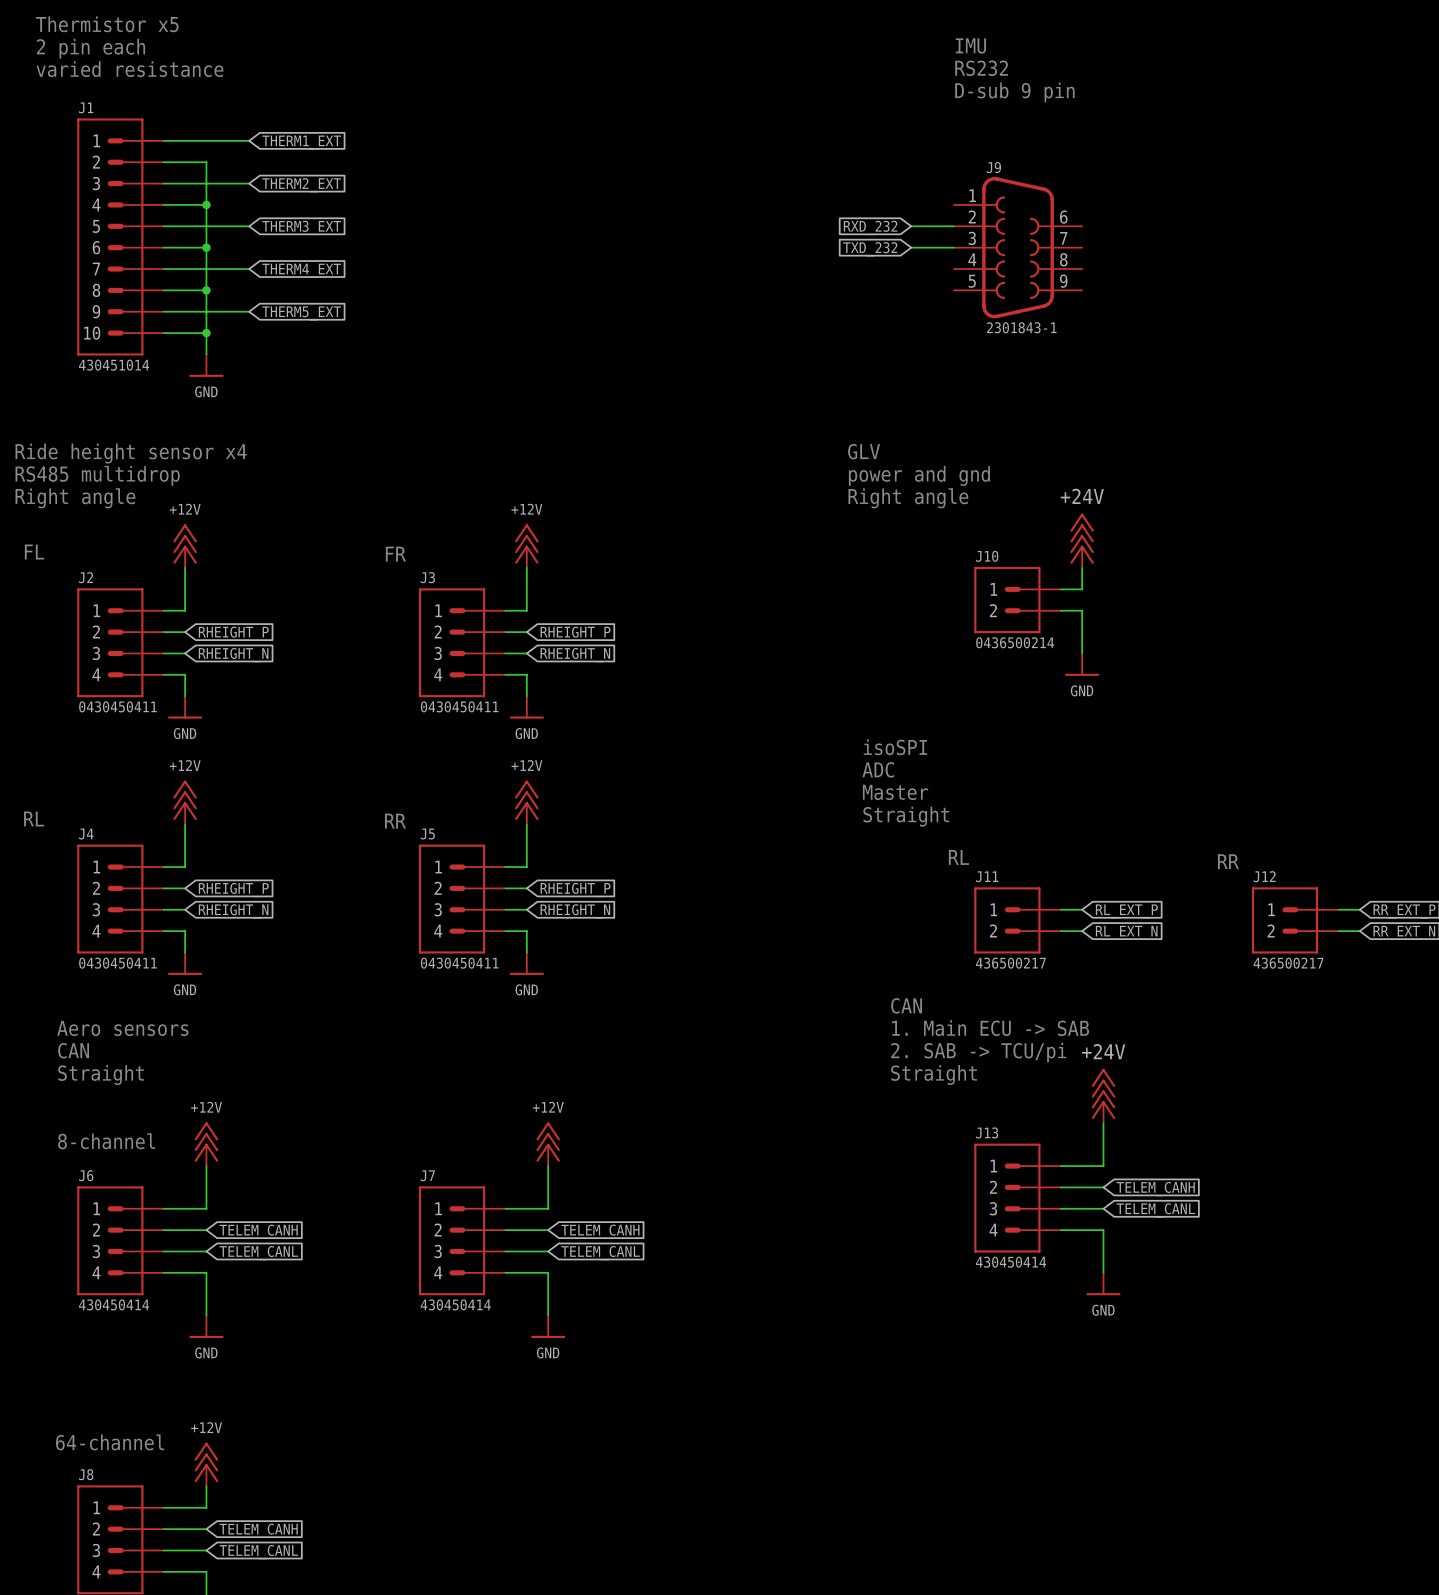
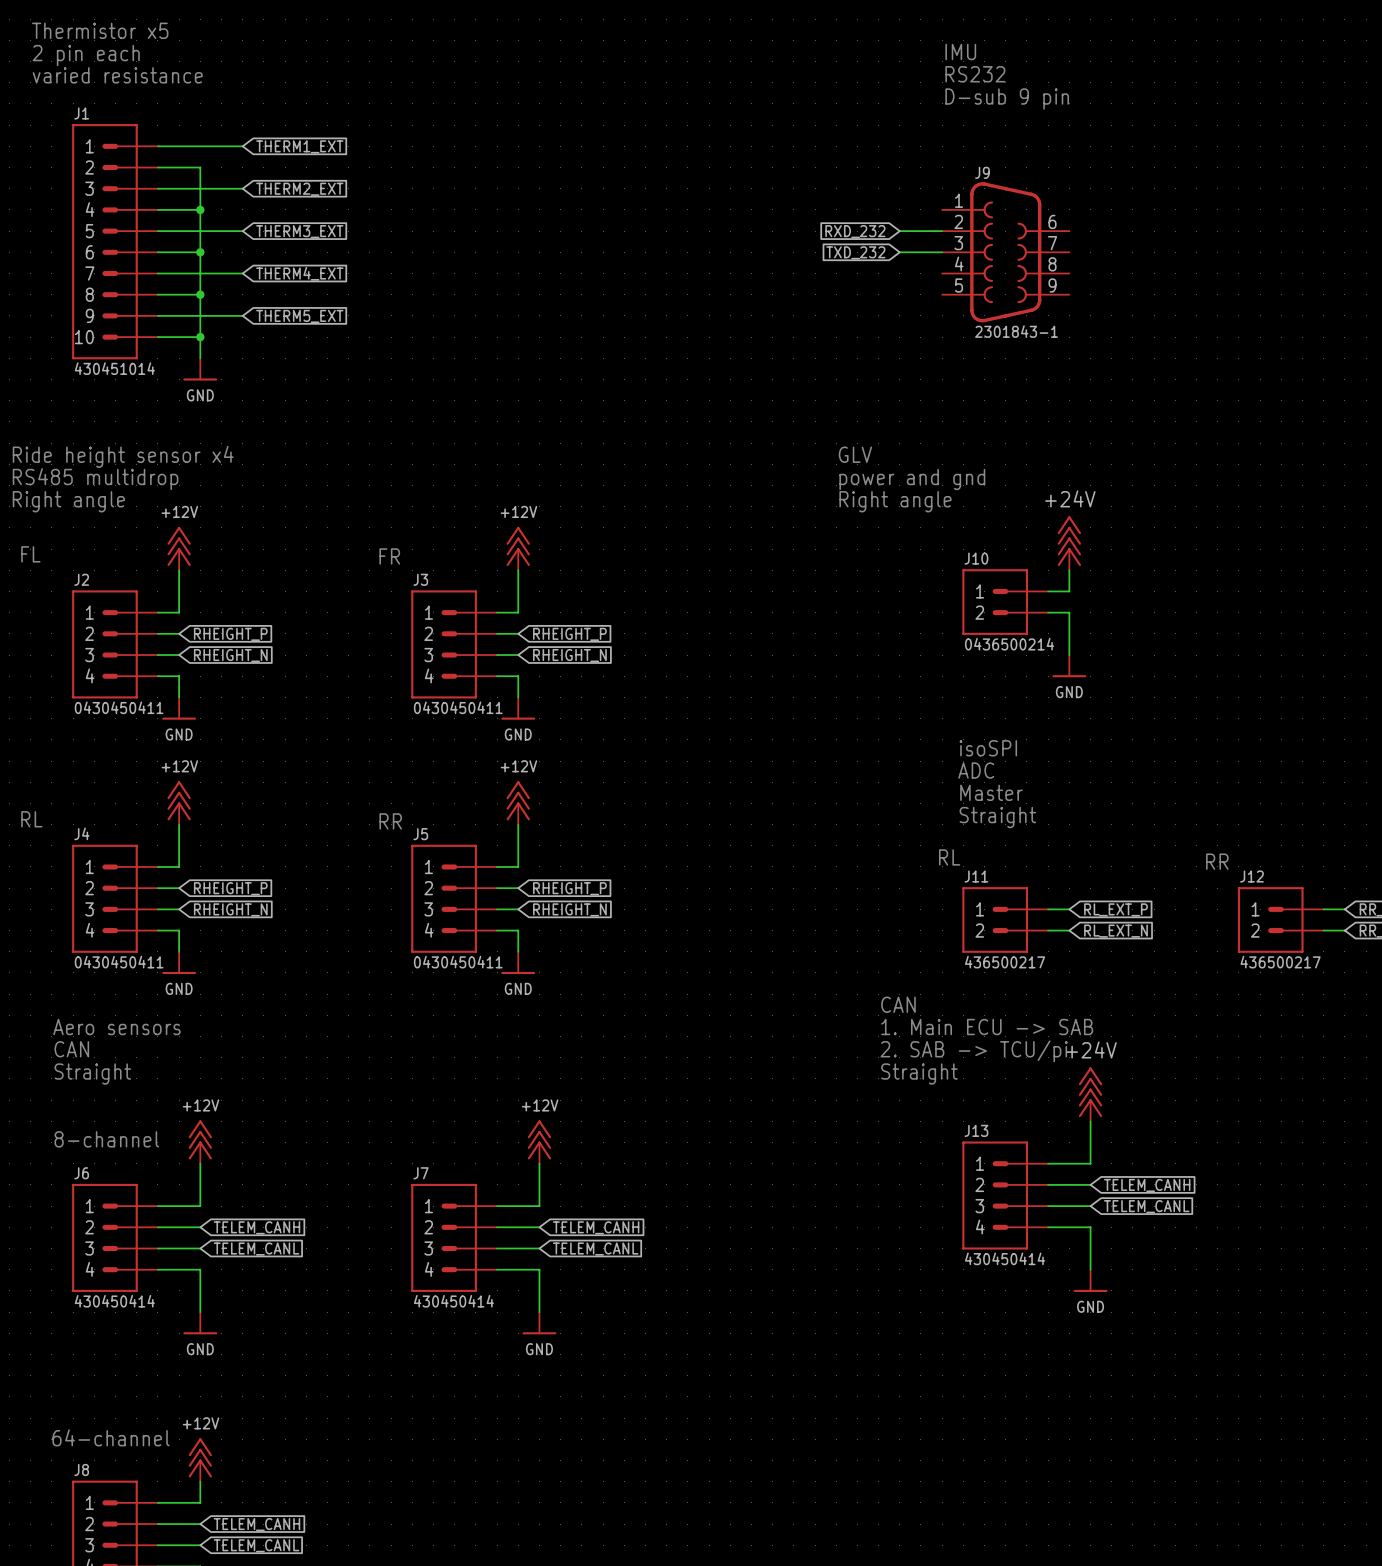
text position: isoSPI (895, 747) -> isoSPI (988, 748)
text position: ADC (878, 769) -> ADC (976, 770)
text position: Master (895, 792) -> Master (991, 792)
text position: Straight (906, 816) -> Straight (997, 817)

